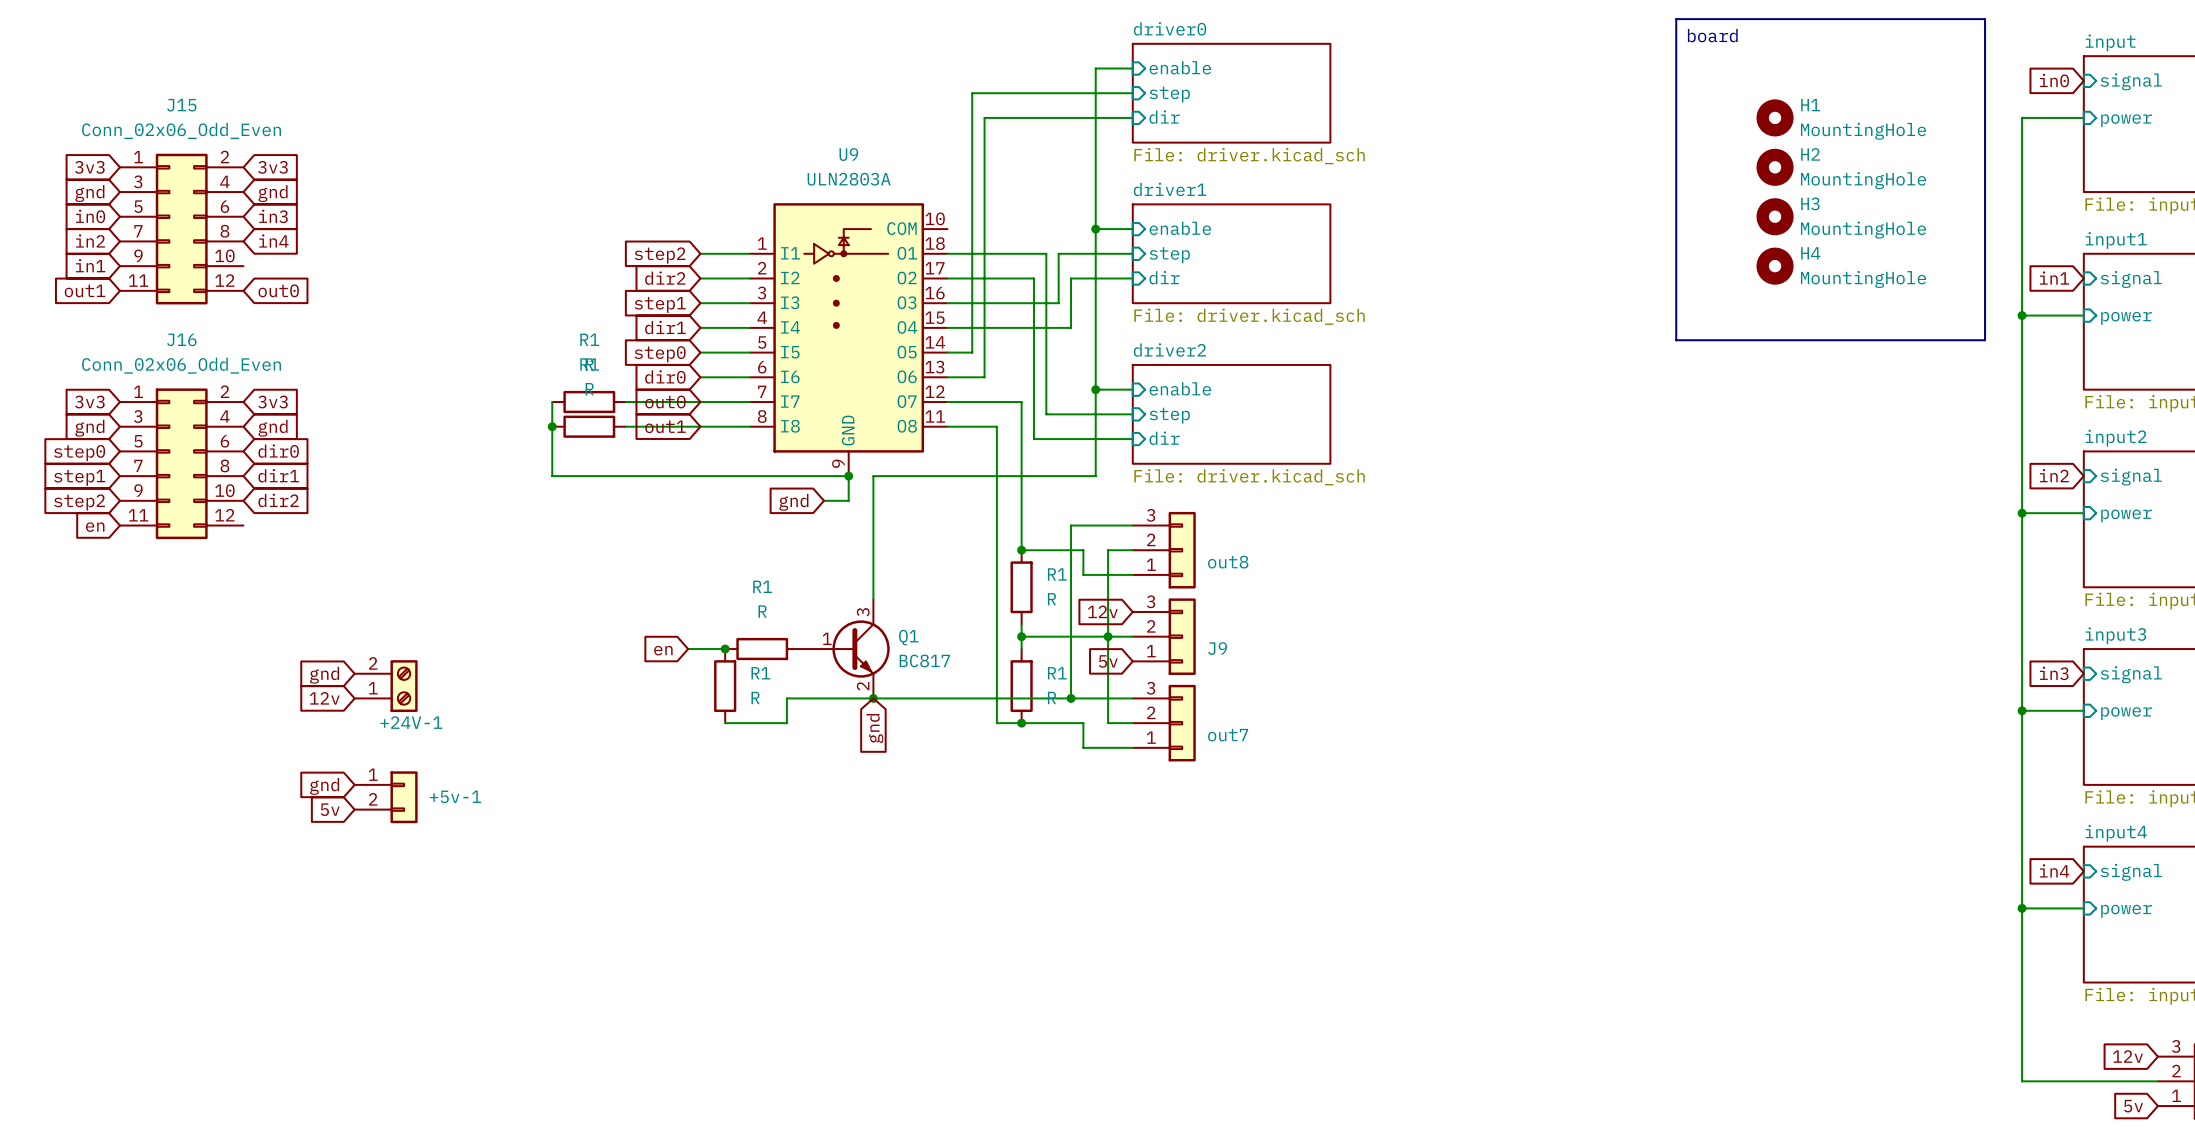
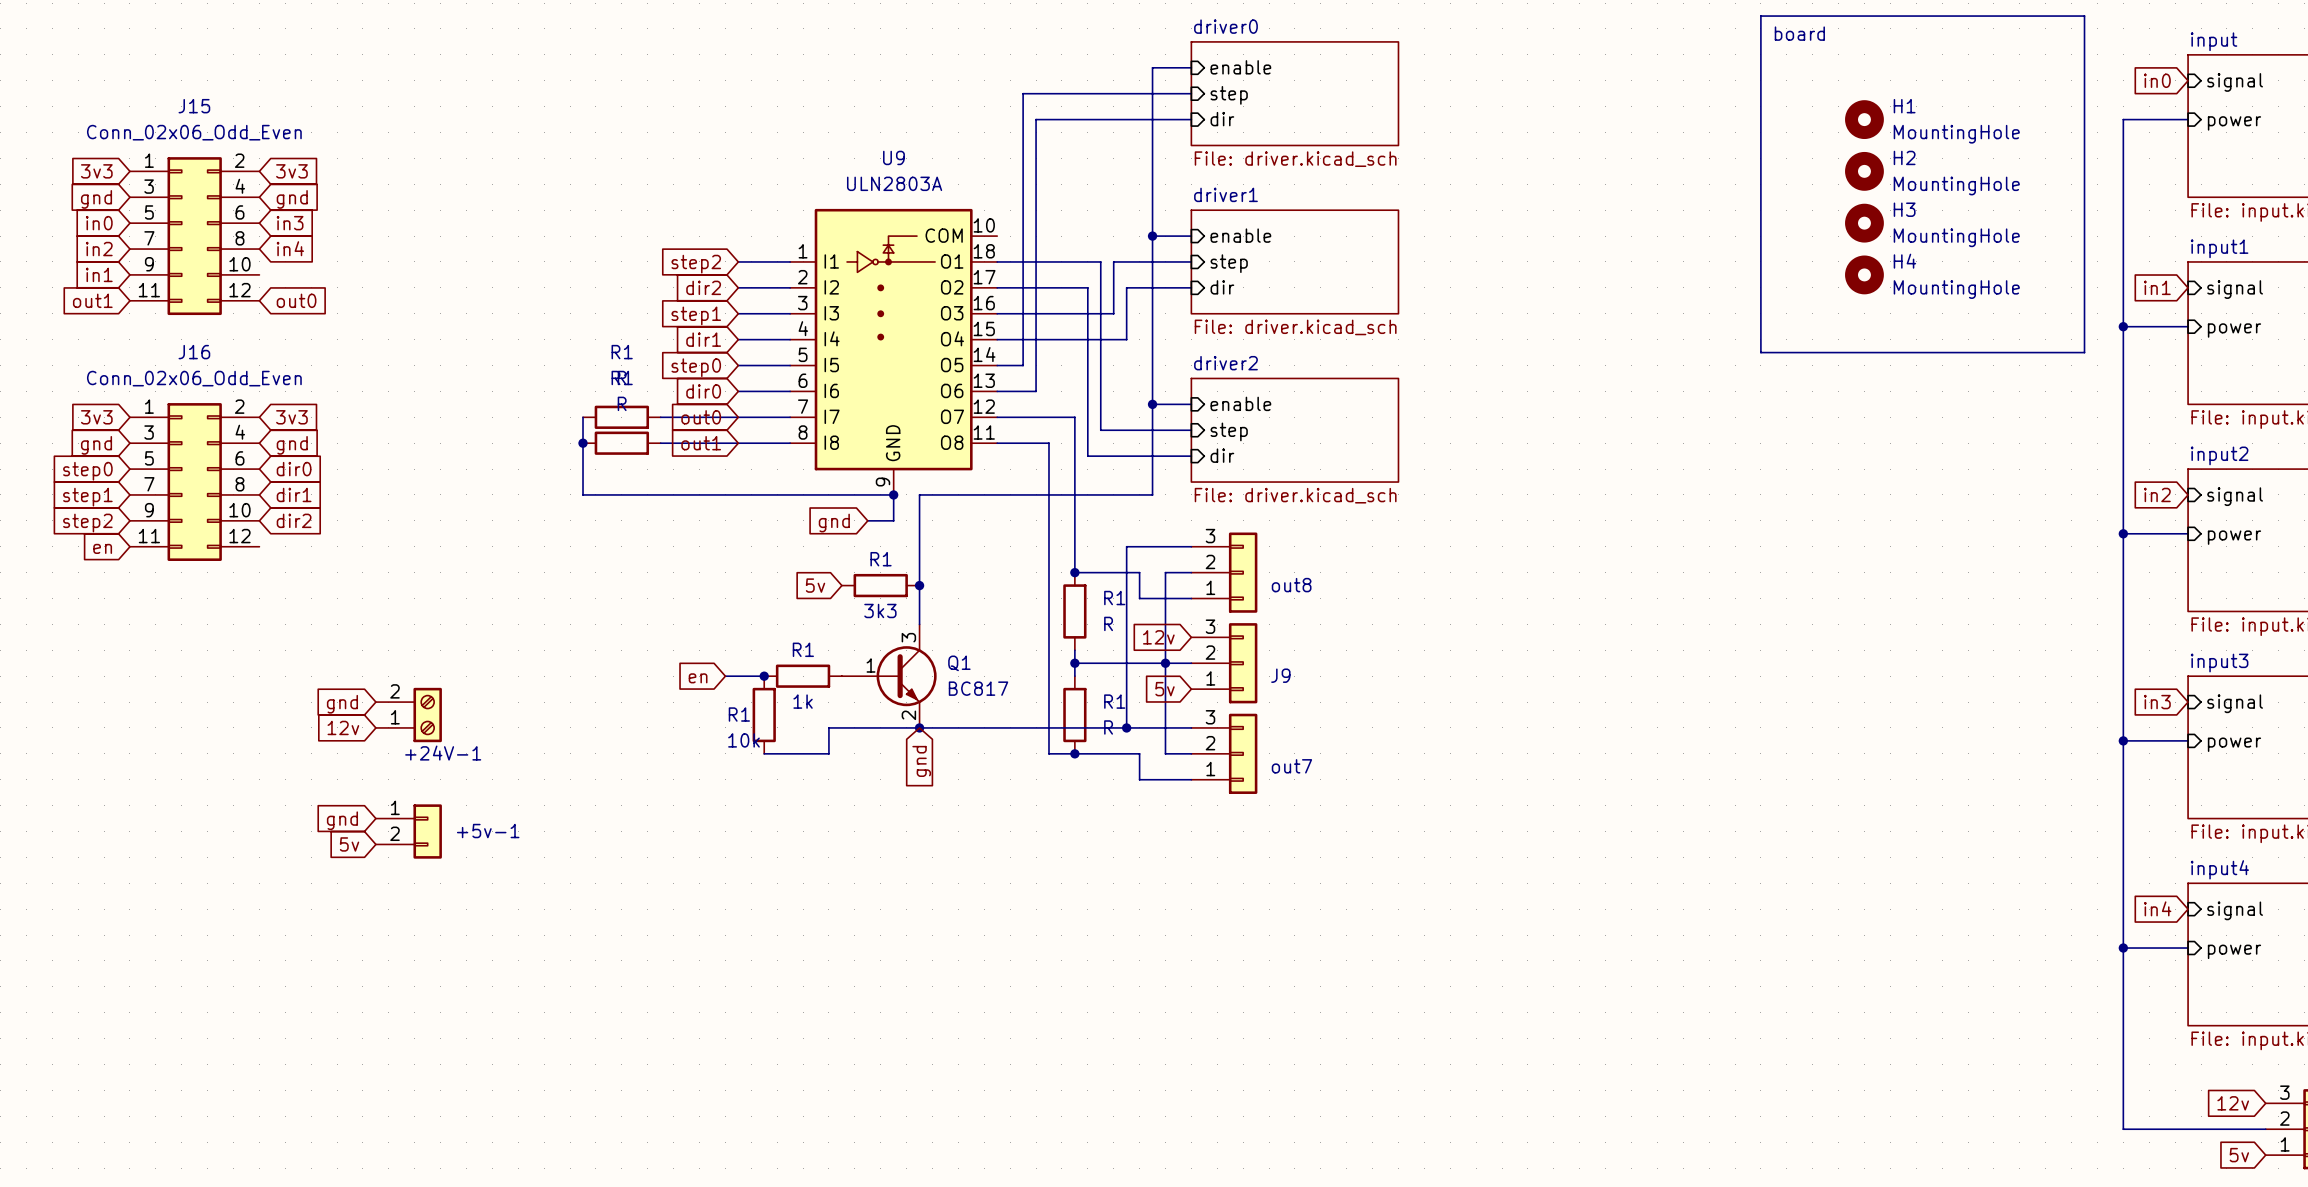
global label: none -> 5v (815, 585)
R1: none -> 3k3 (880, 585)
junction: none -> (919, 585)
R1 name position: R1 (762, 586) -> R1 (803, 649)
R1 value: R (762, 611) -> 1k (803, 701)
R1 name position: R1 (760, 673) -> R1 (739, 714)
R1 value: R (755, 697) -> 10k (743, 740)

